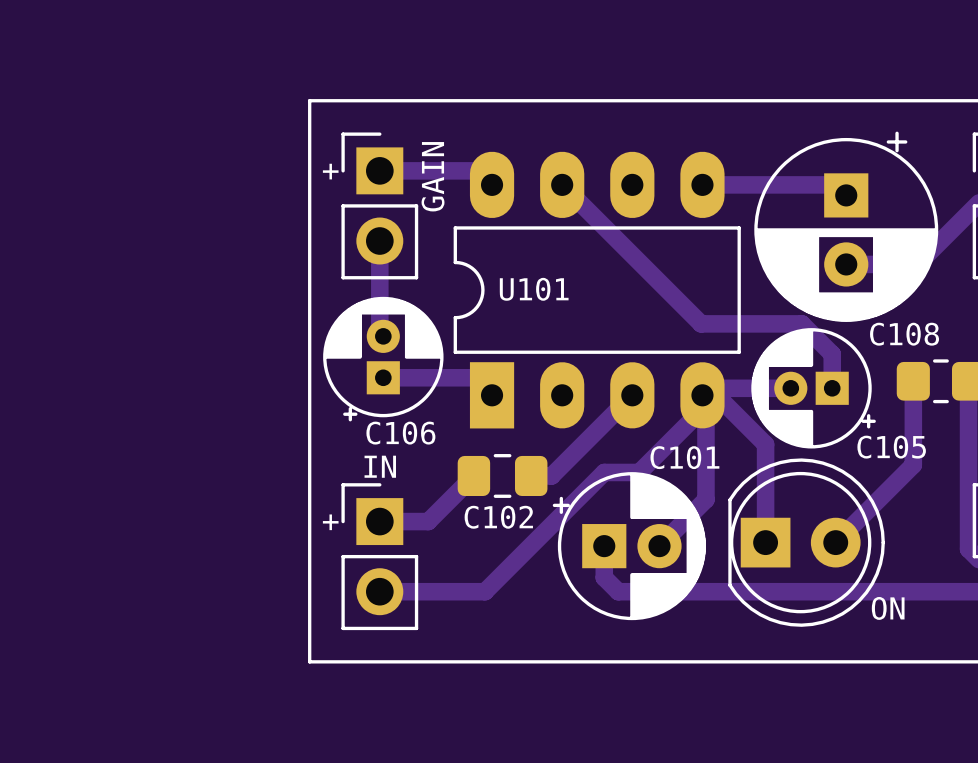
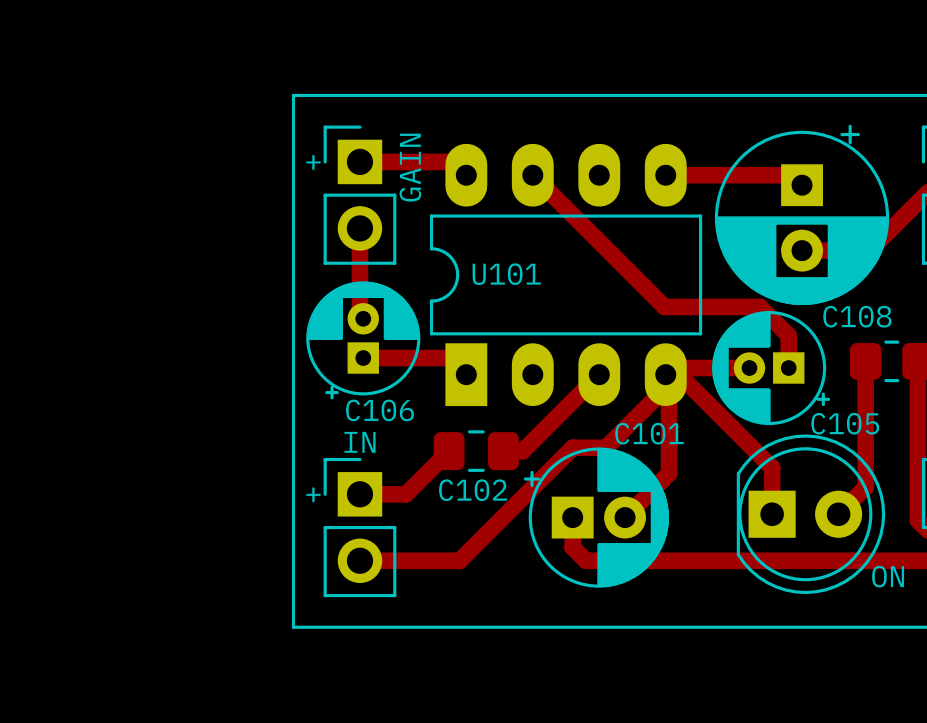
track: (765, 444) (765, 542) -> (725, 421) (772, 467) (772, 514)
track: (913, 465) (835, 542) -> (865, 440) (865, 487) (838, 514)
part position: (806, 542) -> (810, 514)

